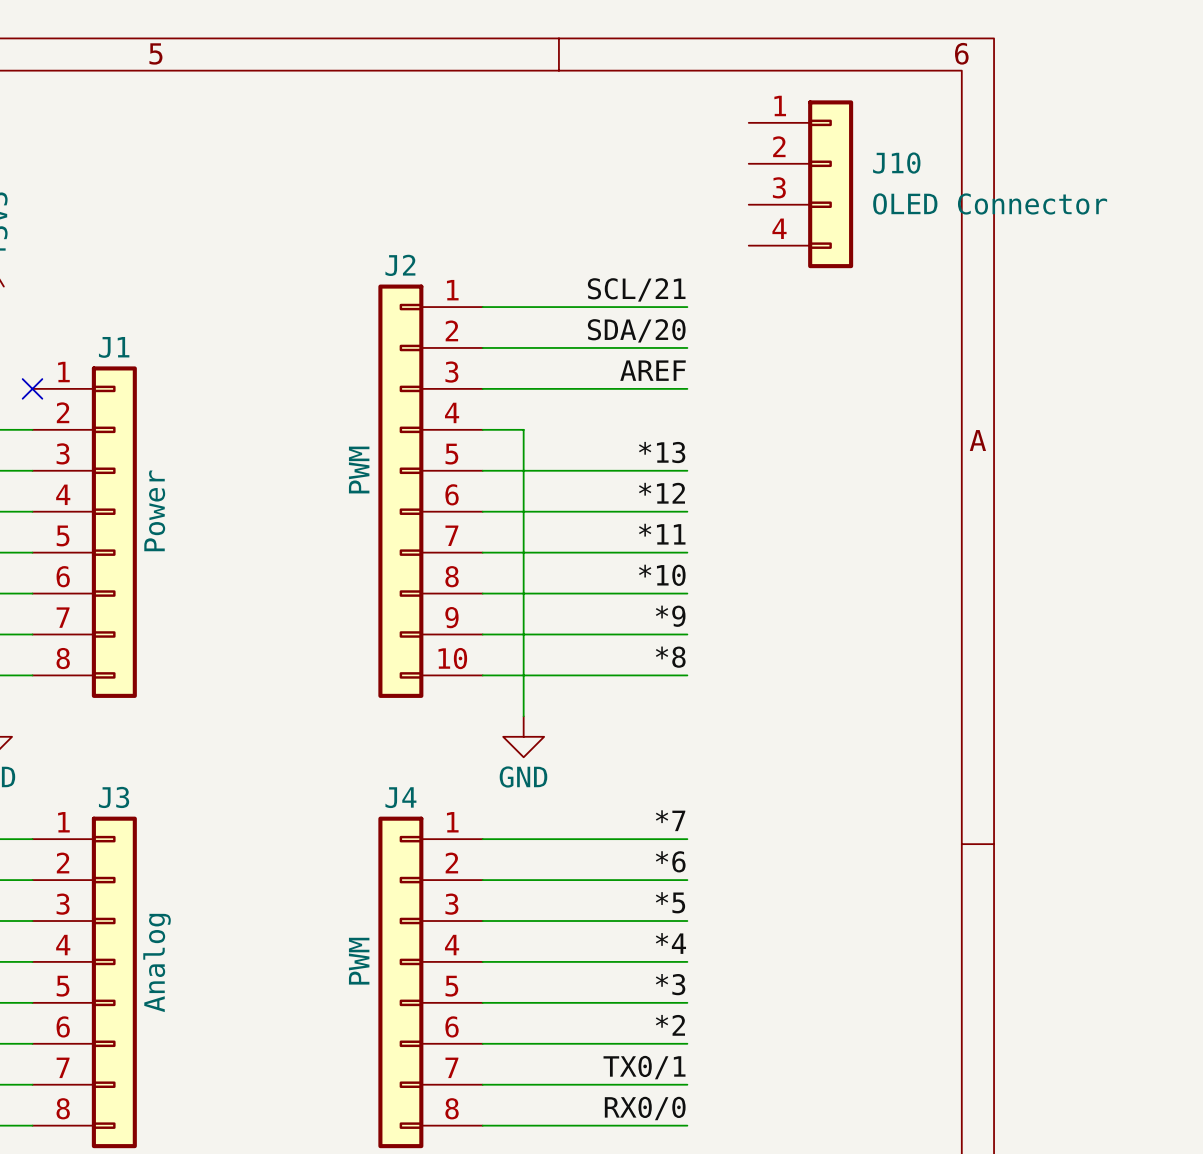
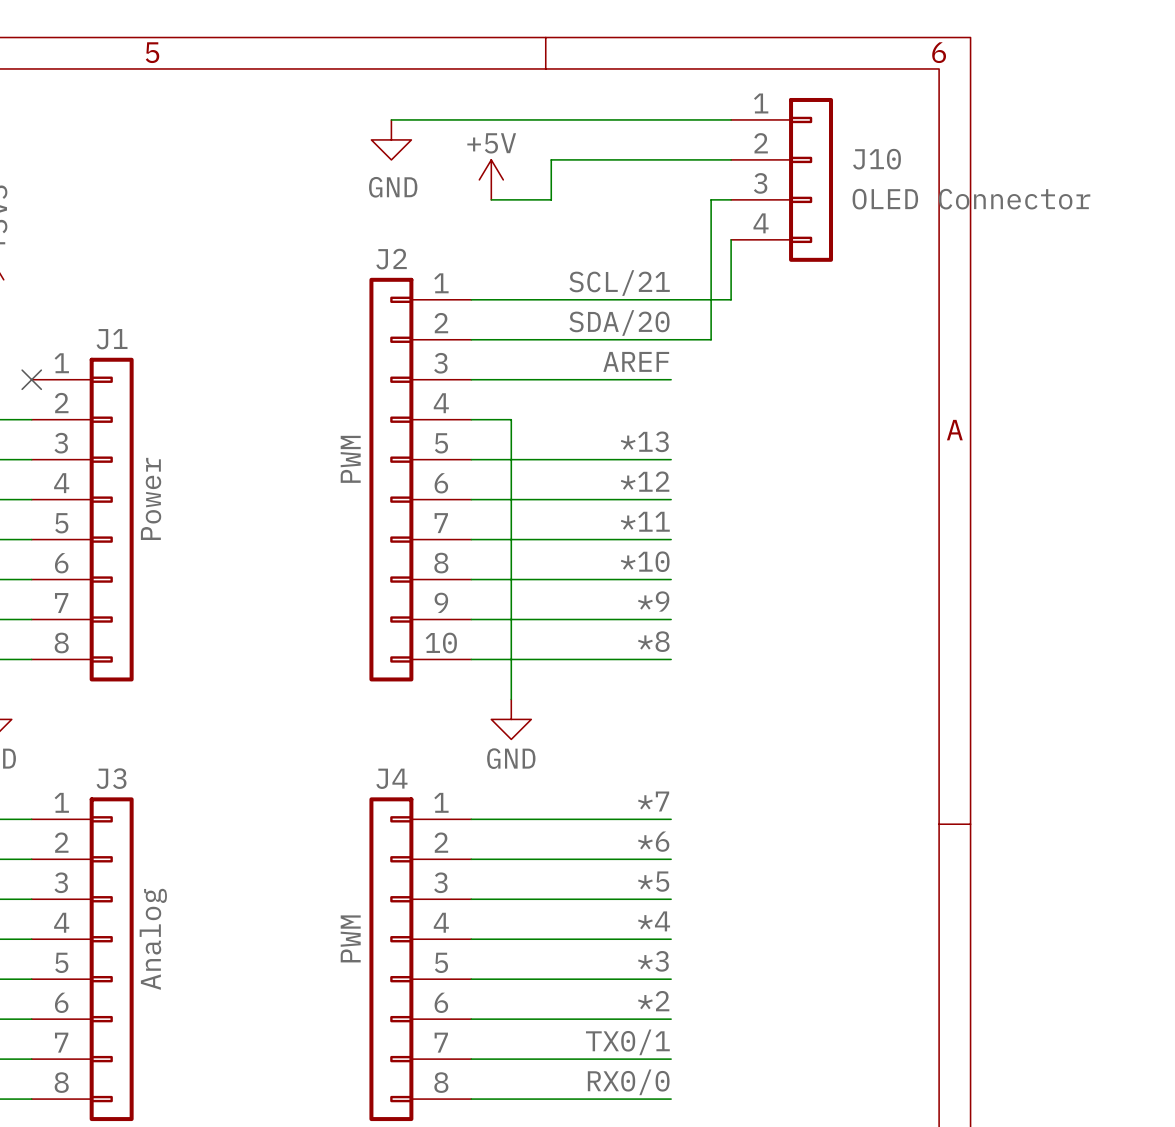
wire: none -> (391, 119) (731, 119)
power symbol: none -> GND (391, 139)
wire: none -> (731, 159) (551, 159) (551, 199) (491, 199)
power symbol: none -> +5V (491, 179)
wire: none -> (731, 199) (711, 199) (711, 339) (671, 339)
wire: none -> (731, 239) (731, 299) (671, 299)

